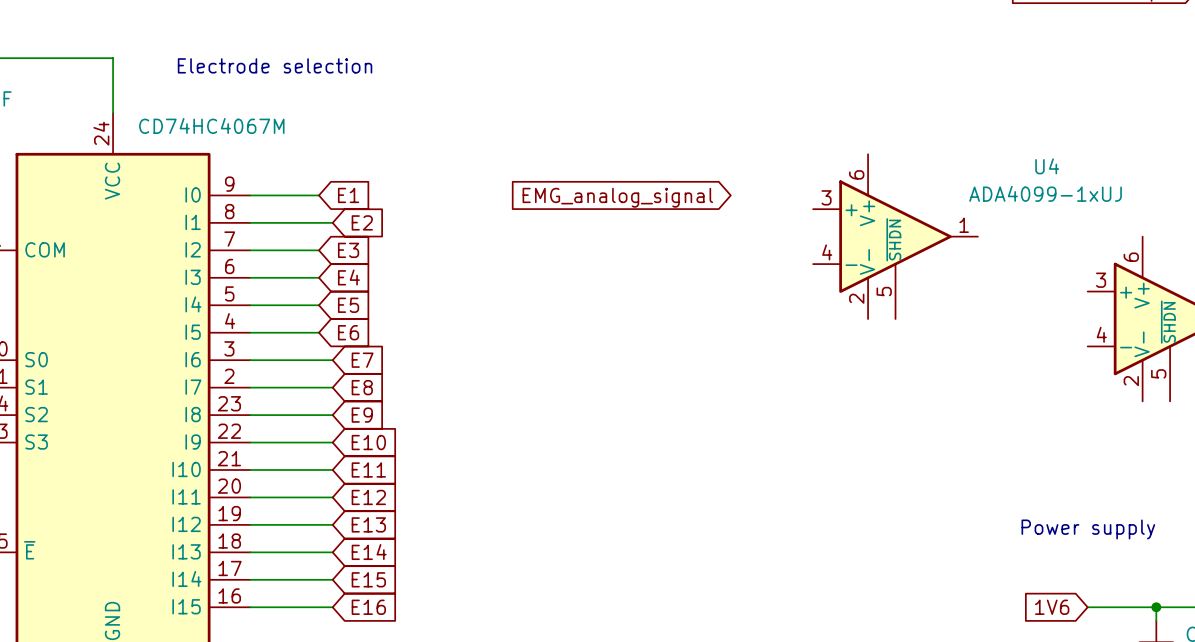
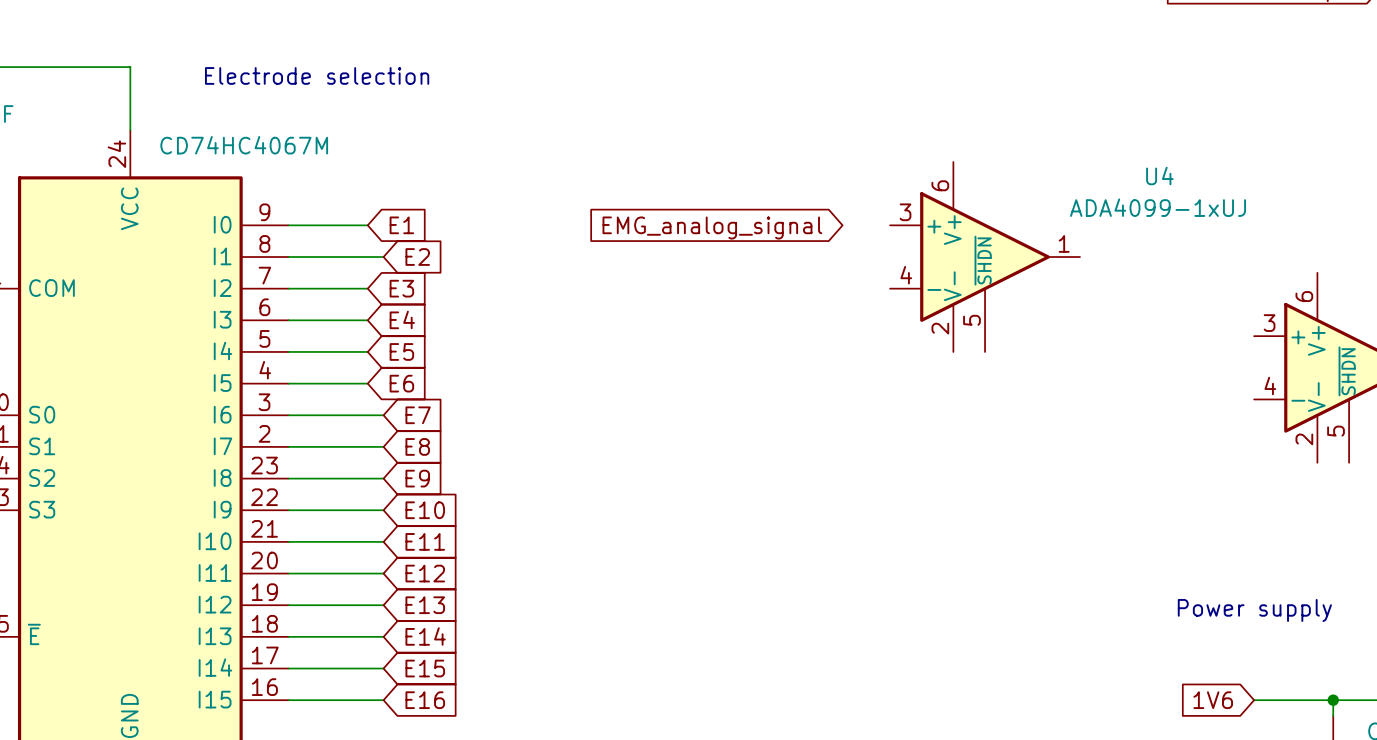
U4 position: (895, 236) -> (985, 257)

